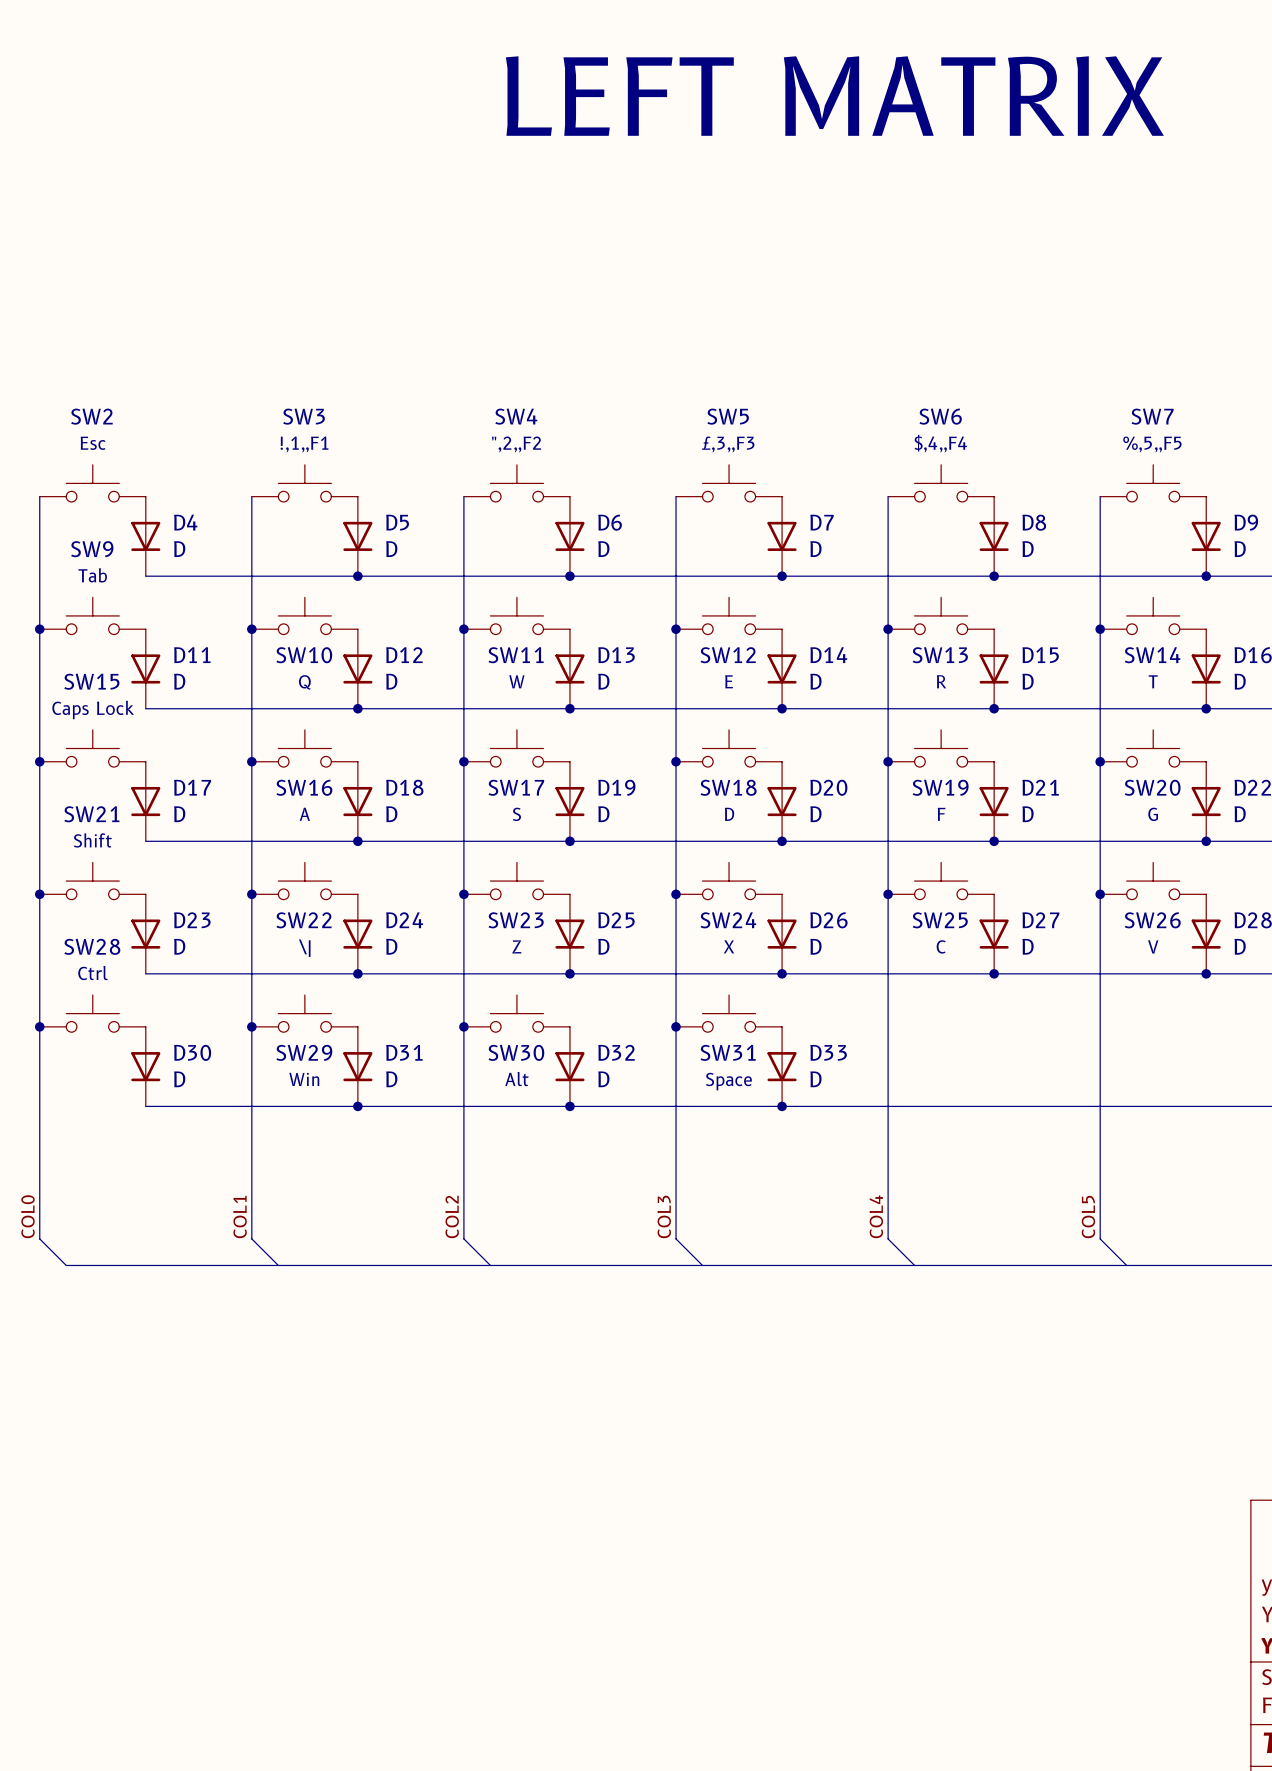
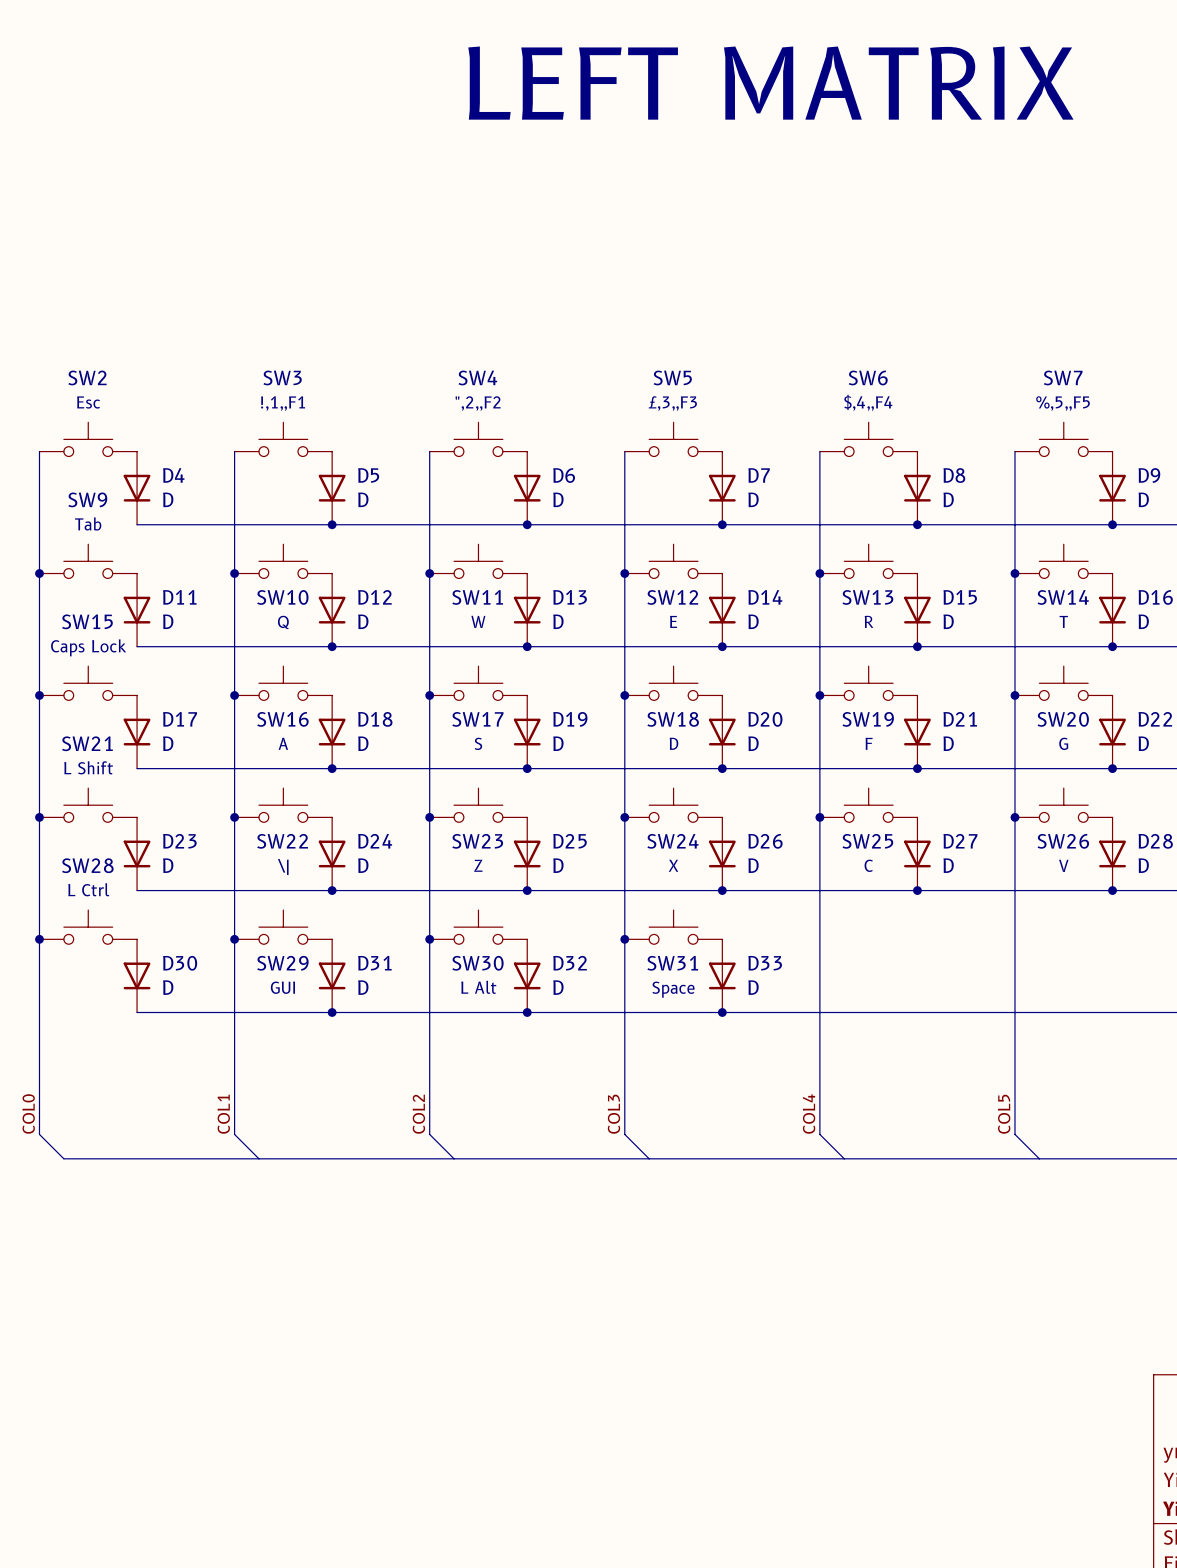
SW21 text: Shift (92, 840) -> L Shift (88, 767)
SW28 text: Ctrl (93, 972) -> L Ctrl (88, 889)
SW29 text: Win (304, 1079) -> GUI (282, 987)
SW30 text: Alt (516, 1079) -> L Alt (478, 987)

